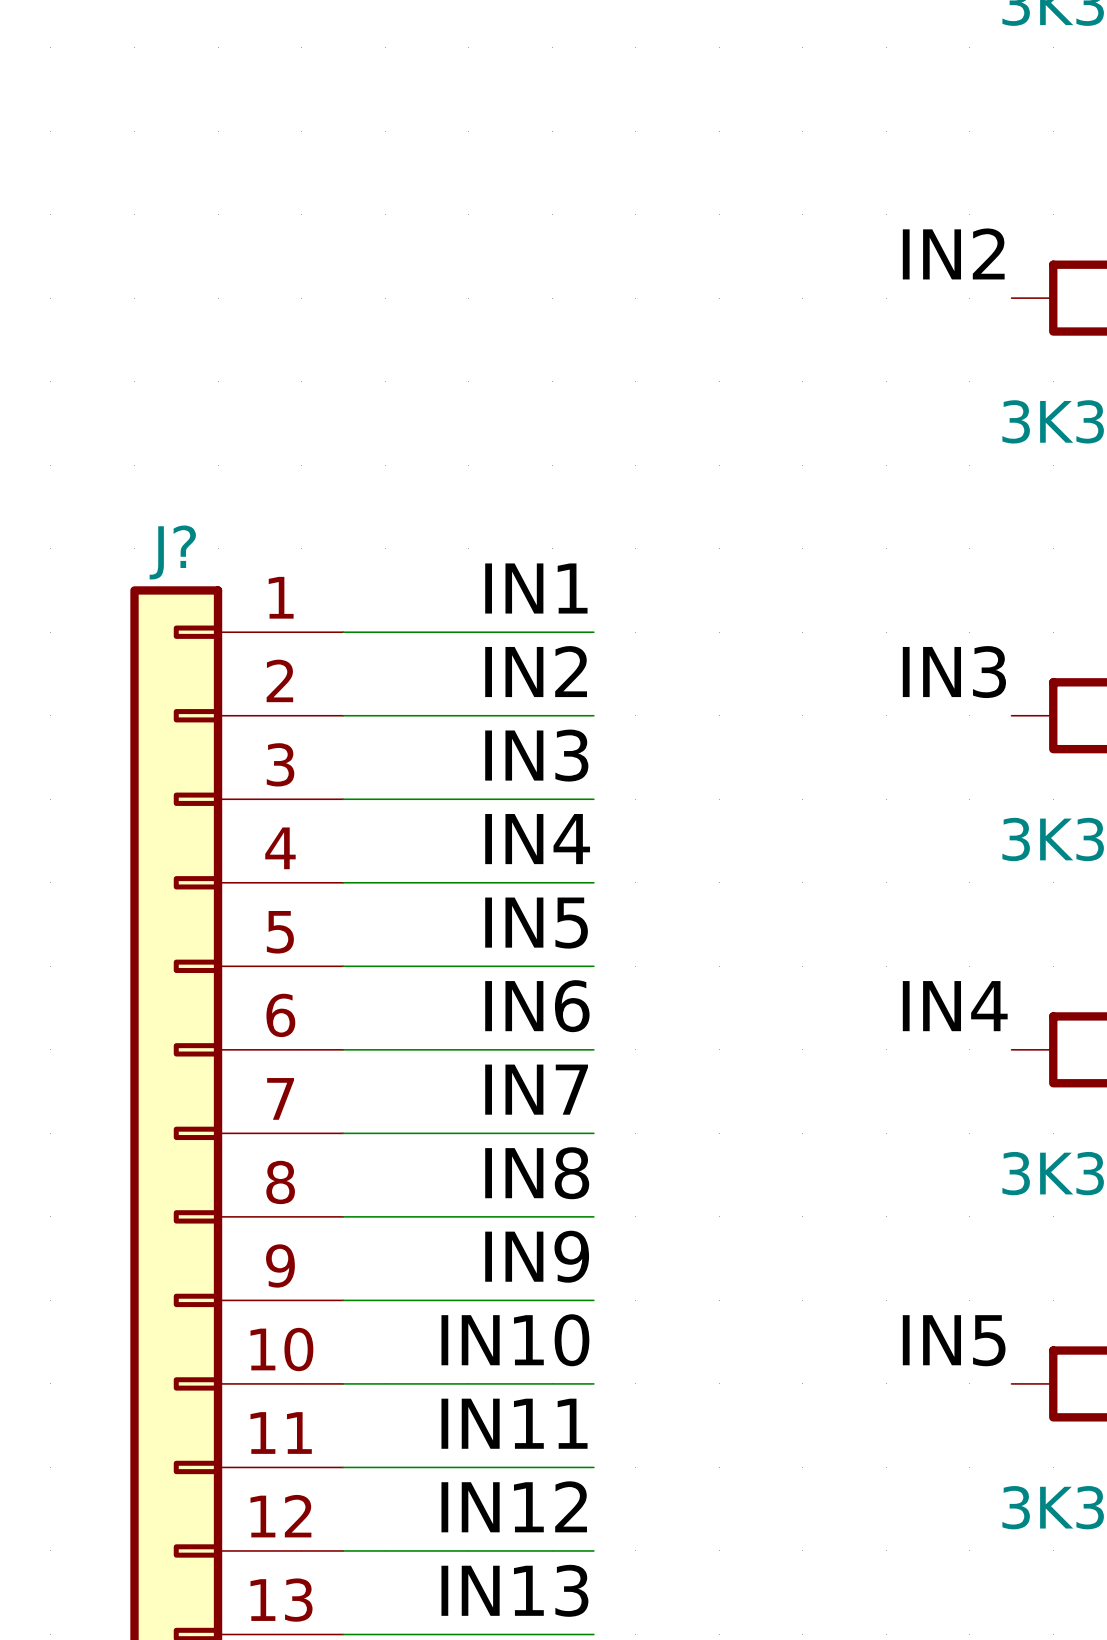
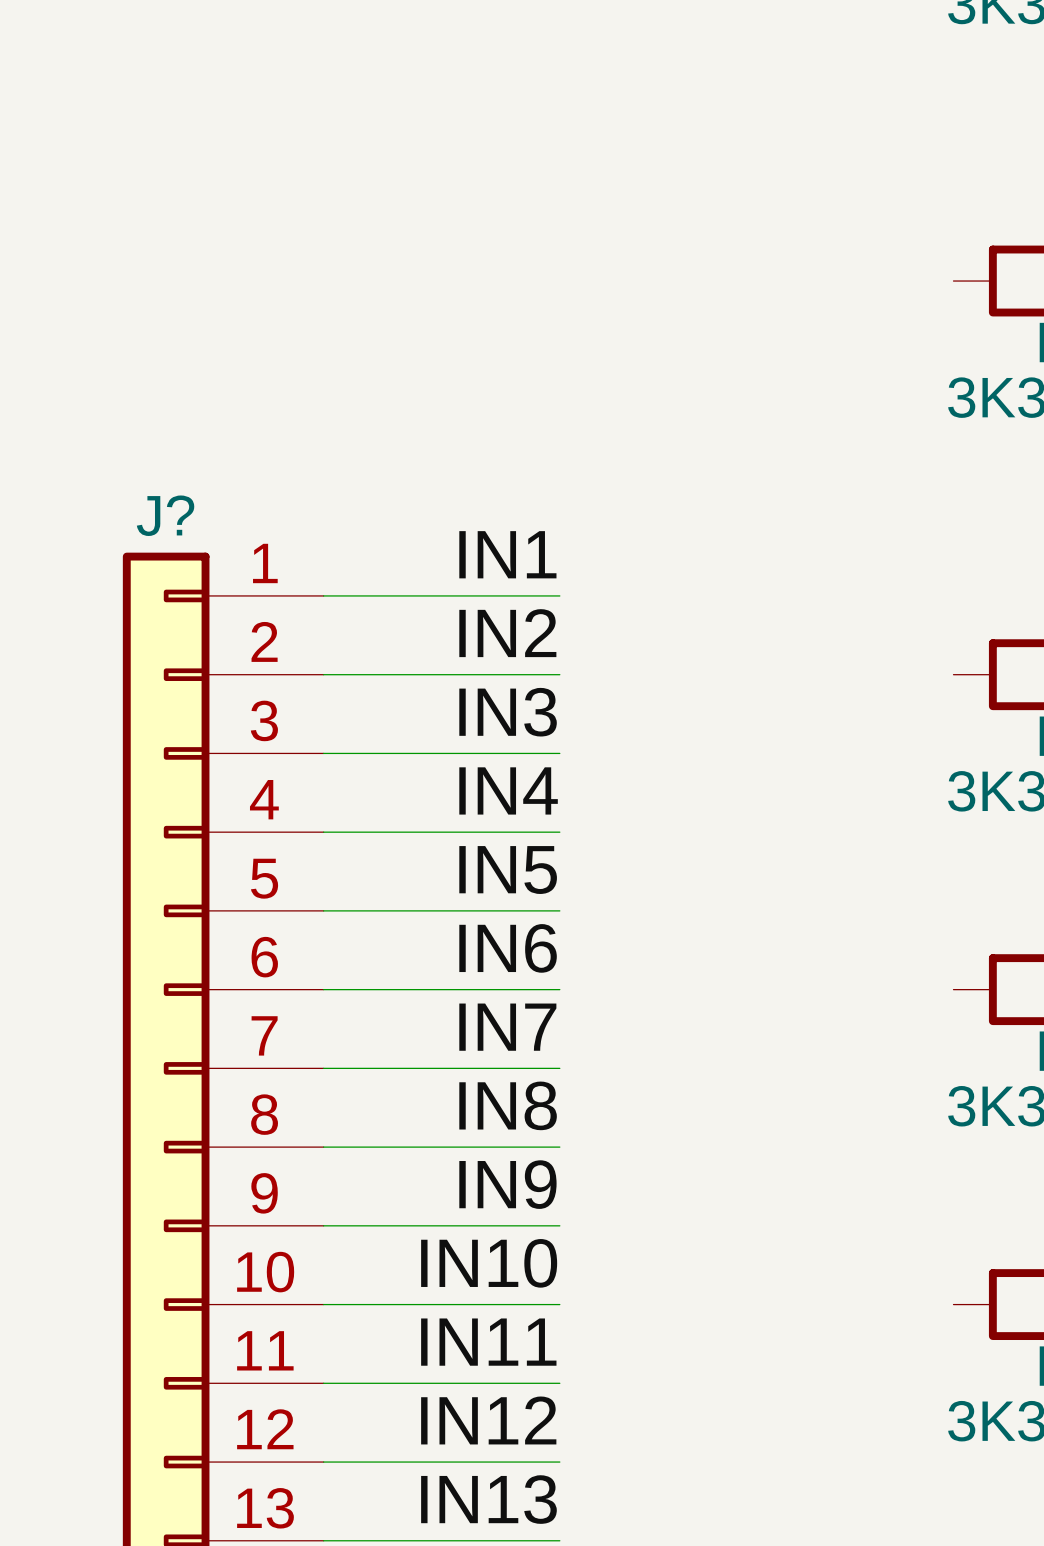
label: IN2 (953, 253) -> none
label: IN3 (954, 672) -> none
label: IN4 (955, 1006) -> none
label: IN5 (954, 1340) -> none

